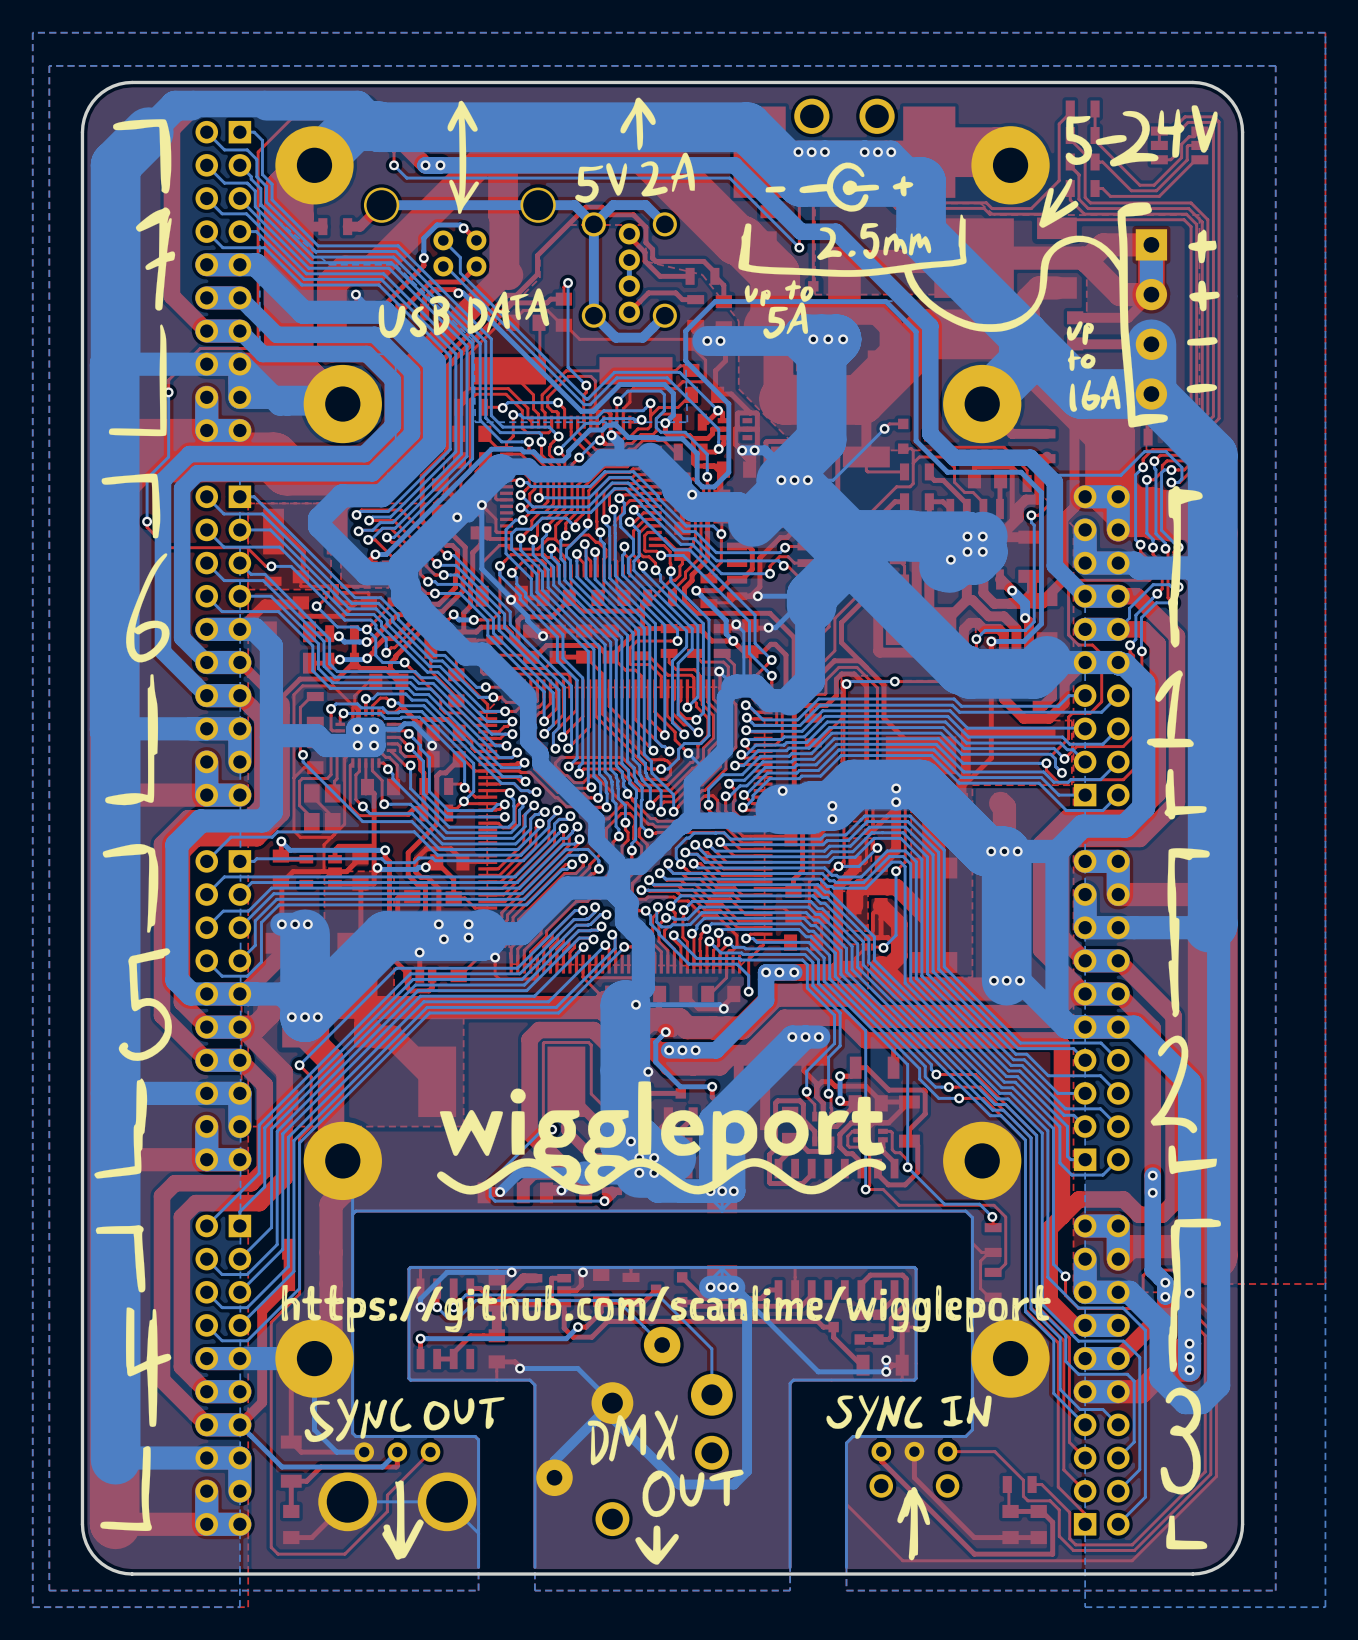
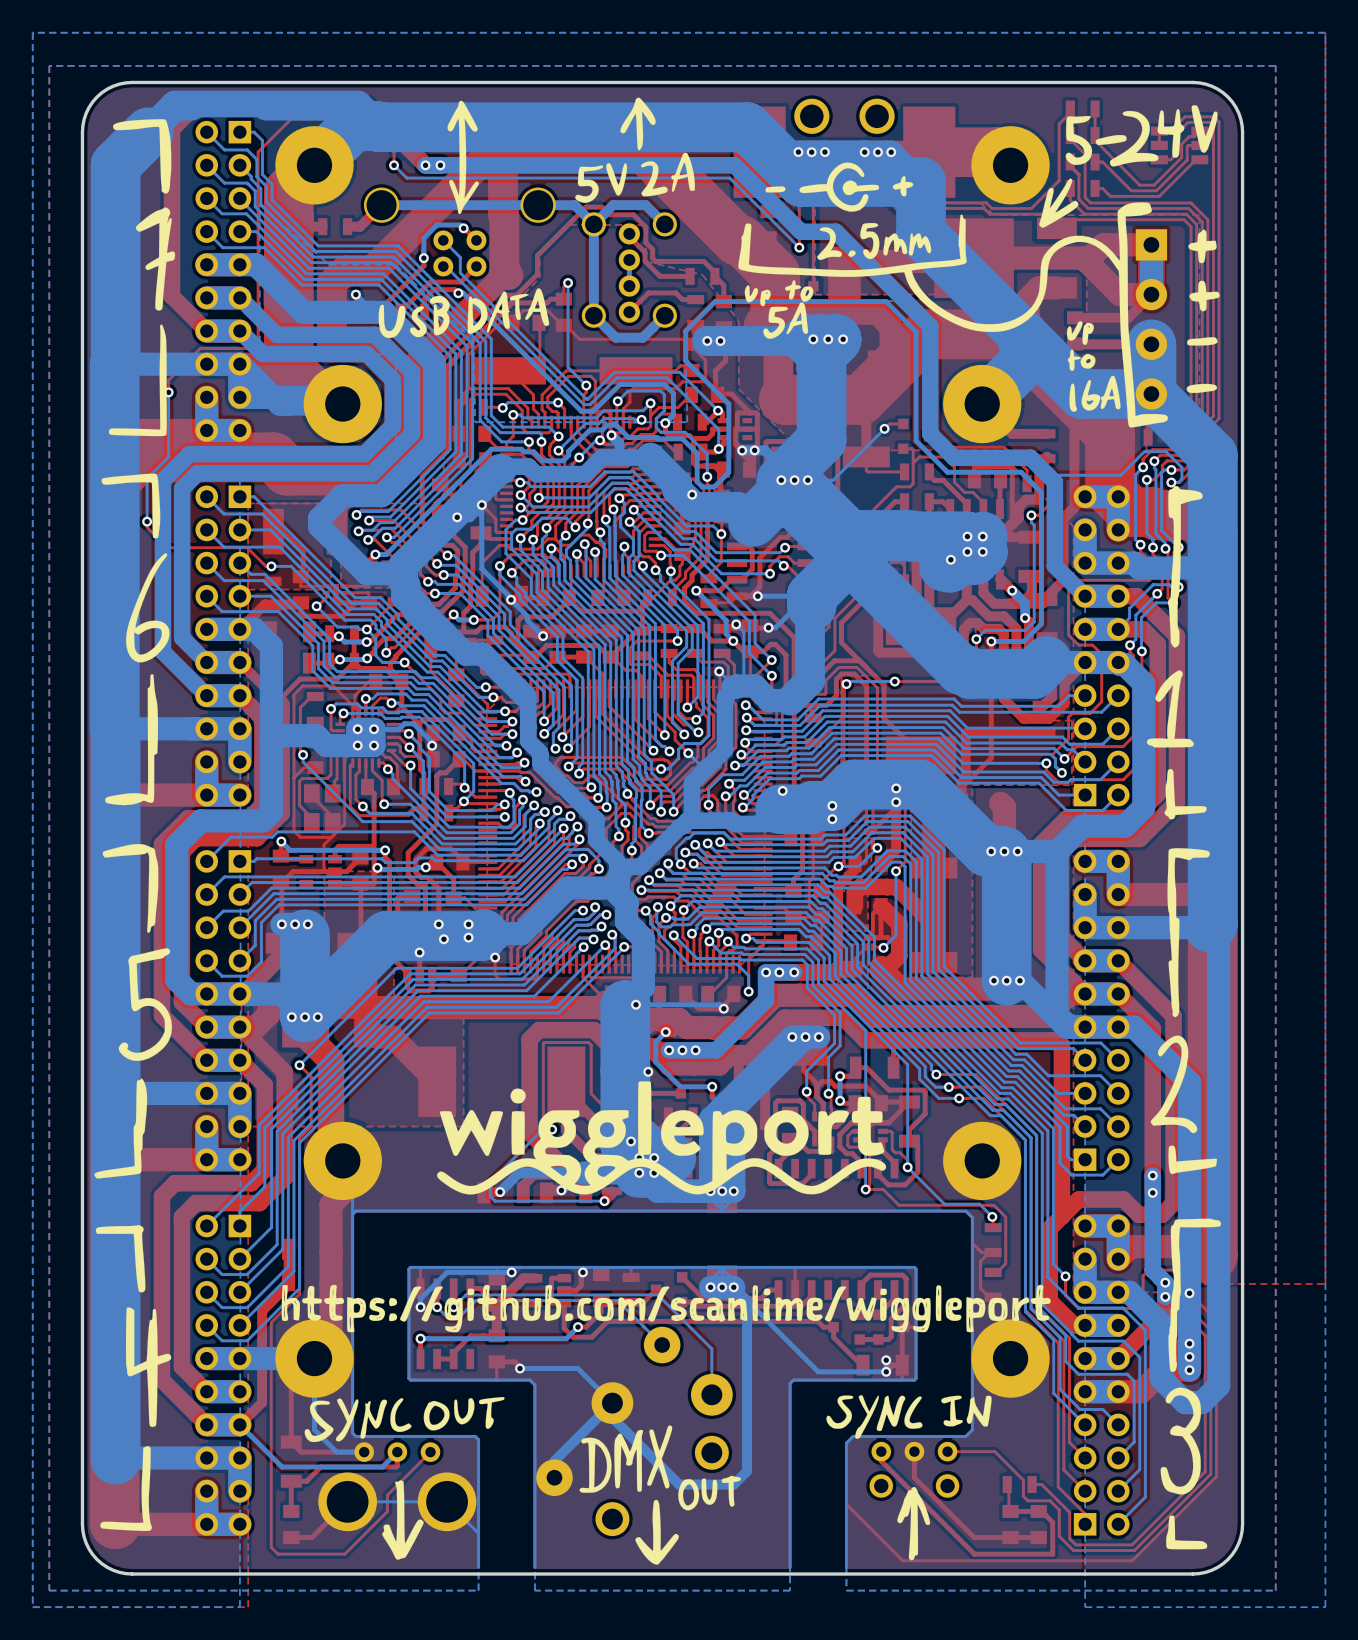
drawing shape: [94, 97, 1221, 1565] -> [94, 97, 1221, 1565]

